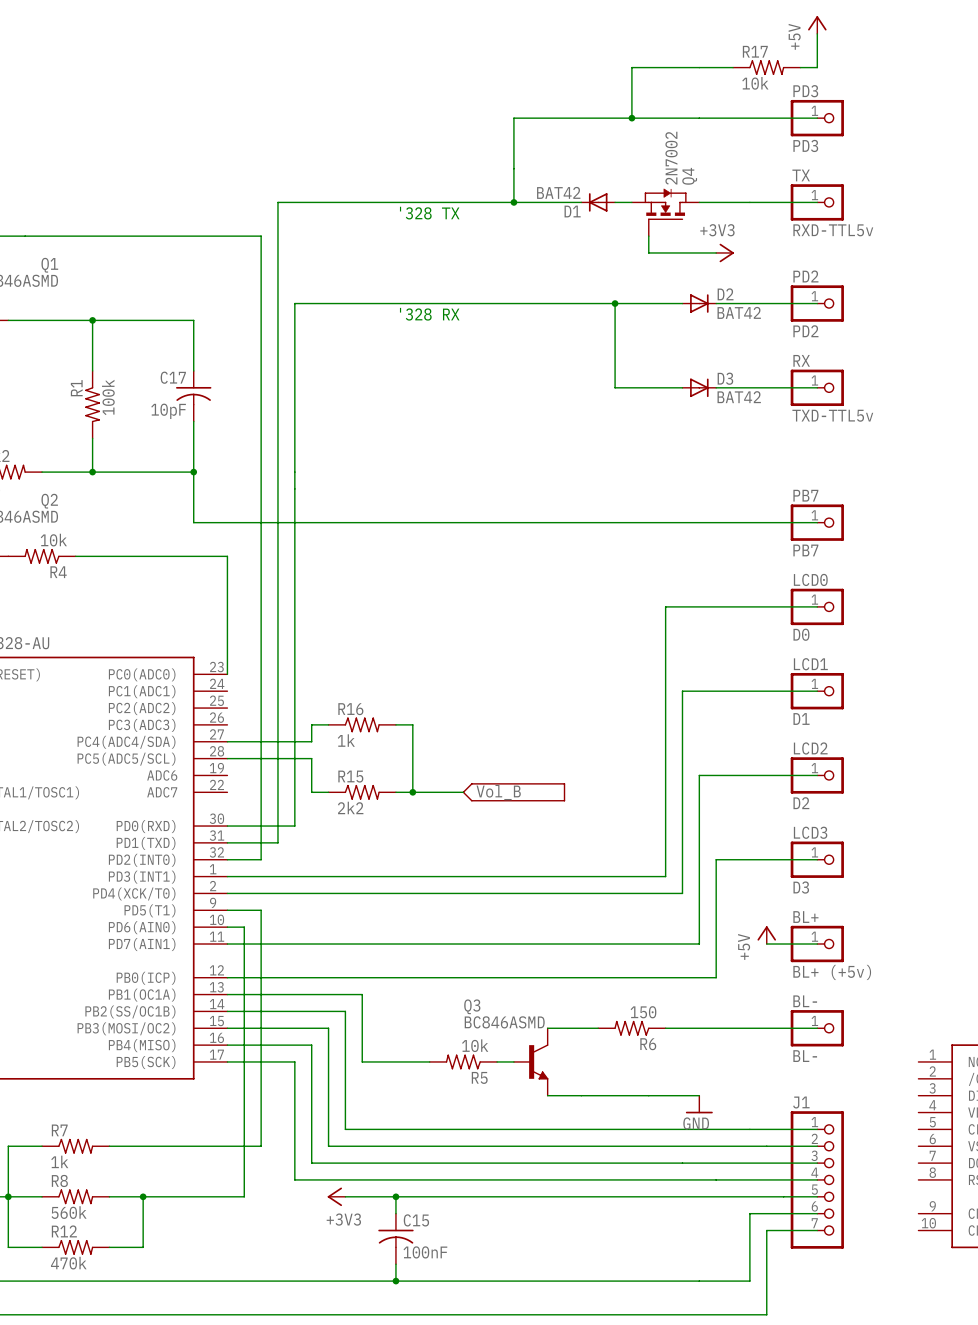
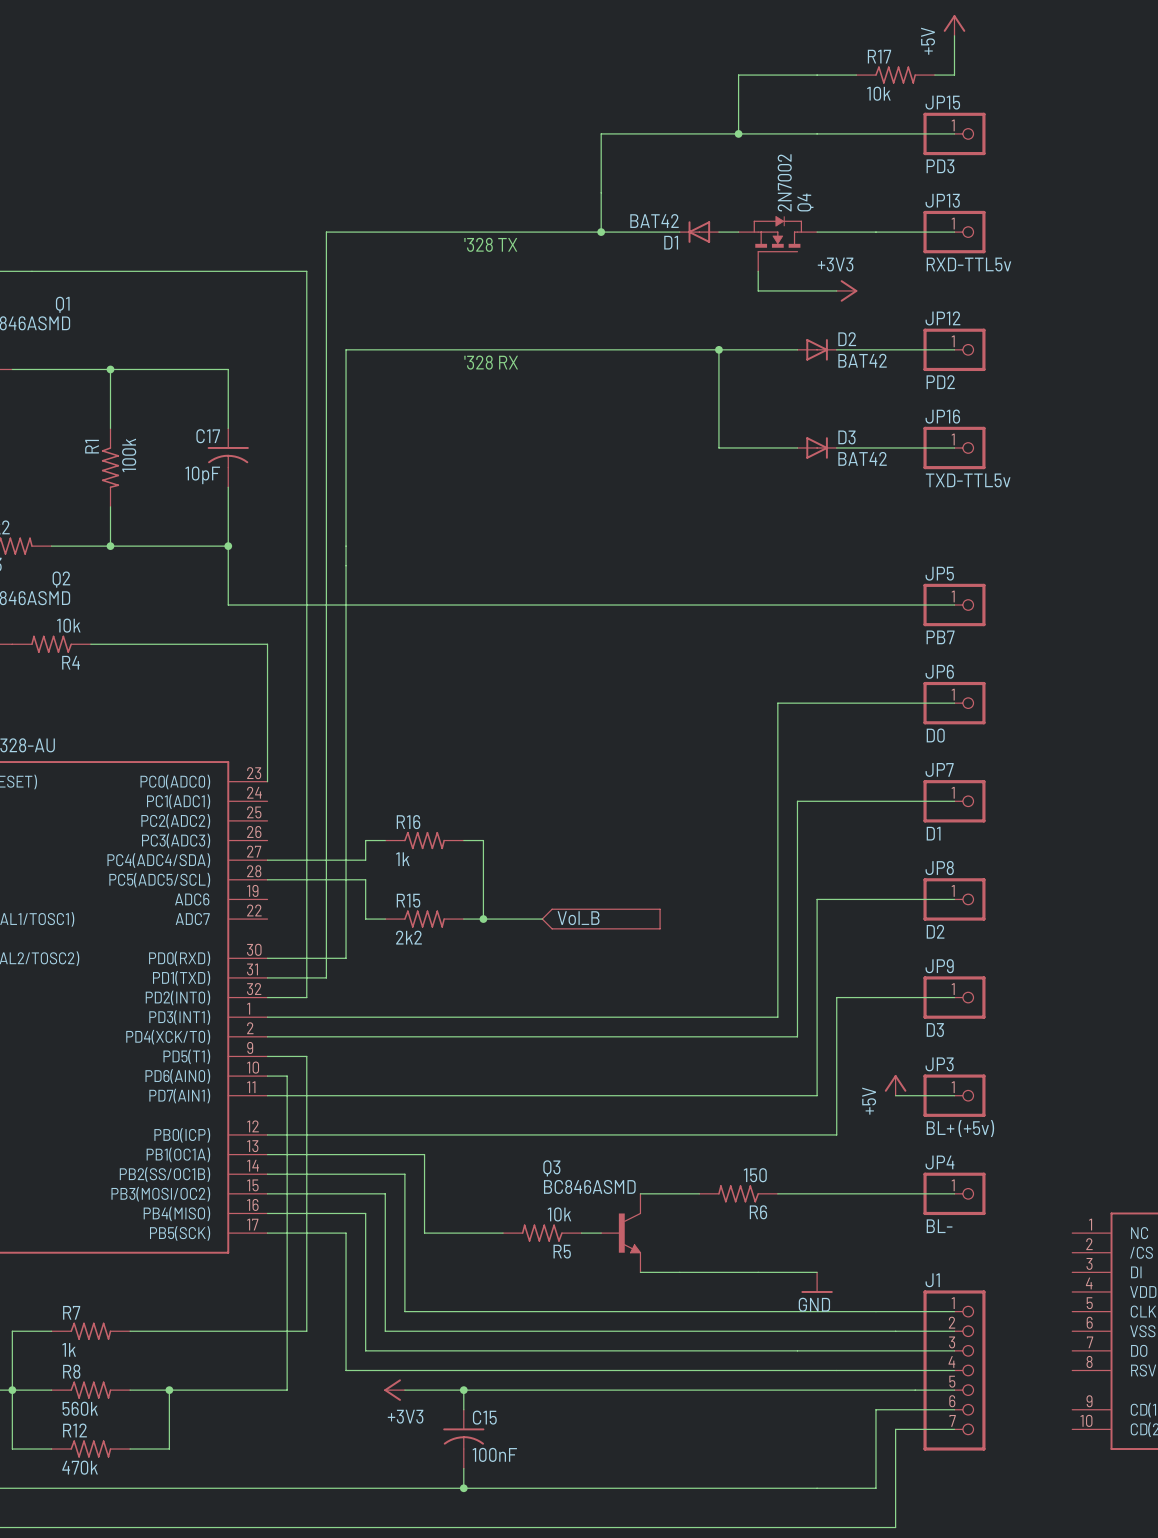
PD3 name: PD3 (805, 91) -> JP15 (942, 102)
TX name: TX (801, 175) -> JP13 (942, 200)
PD2 name: PD2 (805, 276) -> JP12 (942, 318)
RX name: RX (801, 360) -> JP16 (942, 416)
PB7 name: PB7 (805, 495) -> JP5 (939, 573)
LCD0 name: LCD0 (810, 579) -> JP6 (939, 671)
LCD1 name: LCD1 (810, 664) -> JP7 (939, 769)
LCD2 name: LCD2 (810, 748) -> JP8 (939, 868)
LCD3 name: LCD3 (810, 832) -> JP9 (939, 966)
BL+ name: BL+ (805, 917) -> JP3 (939, 1064)
BL- name: BL- (805, 1001) -> JP4 (939, 1162)

